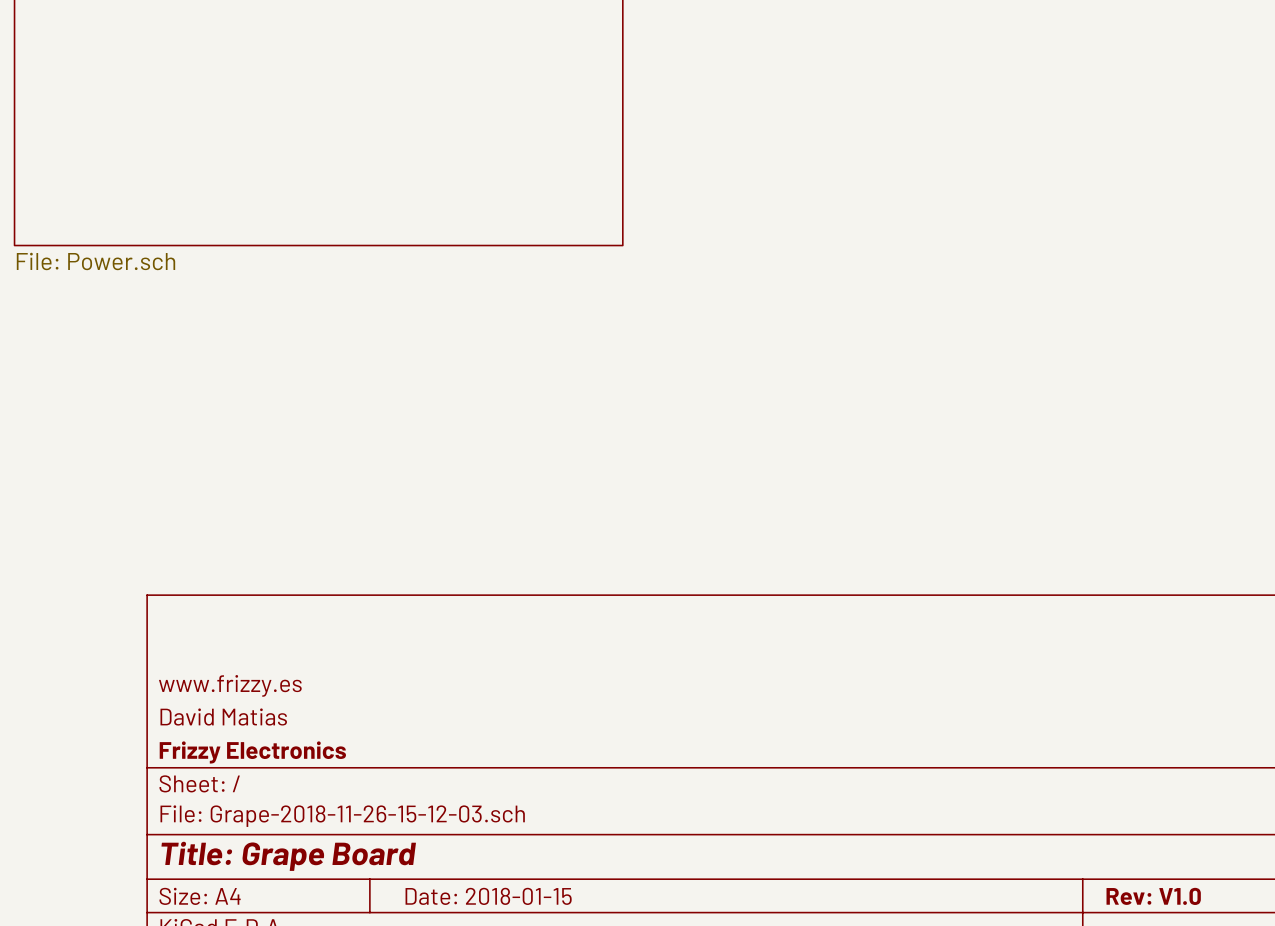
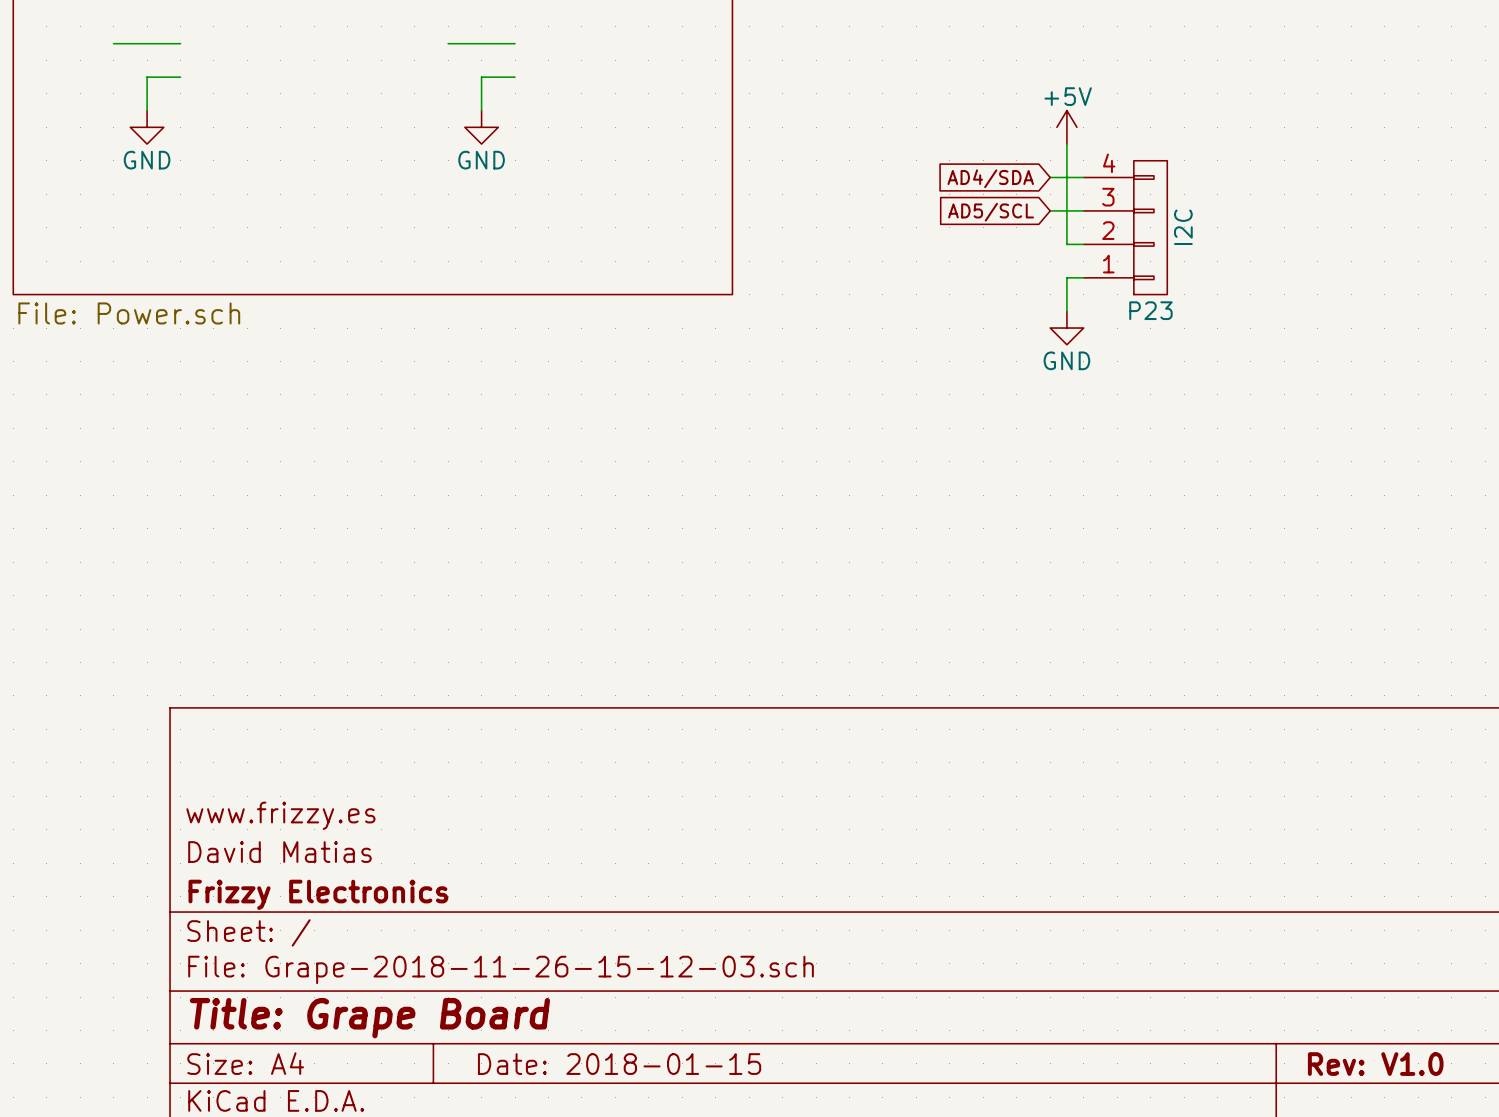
wire: none -> (113, 43) (180, 43)
wire: none -> (448, 43) (515, 43)
wire: none -> (180, 77) (147, 77) (147, 110)
wire: none -> (515, 77) (481, 77) (481, 110)
power symbol: none -> GND (147, 127)
power symbol: none -> GND (481, 127)
power symbol: none -> +5V (1066, 127)
wire: none -> (1066, 144) (1066, 244) (1083, 244)
global label: none -> AD4/SDA (990, 178)
wire: none -> (1050, 177) (1083, 177)
global label: none -> AD5/SCL (991, 212)
wire: none -> (1050, 210) (1083, 210)
P23: none -> I2C (1125, 227)
wire: none -> (1083, 277) (1066, 277) (1066, 311)
power symbol: none -> GND (1066, 328)

